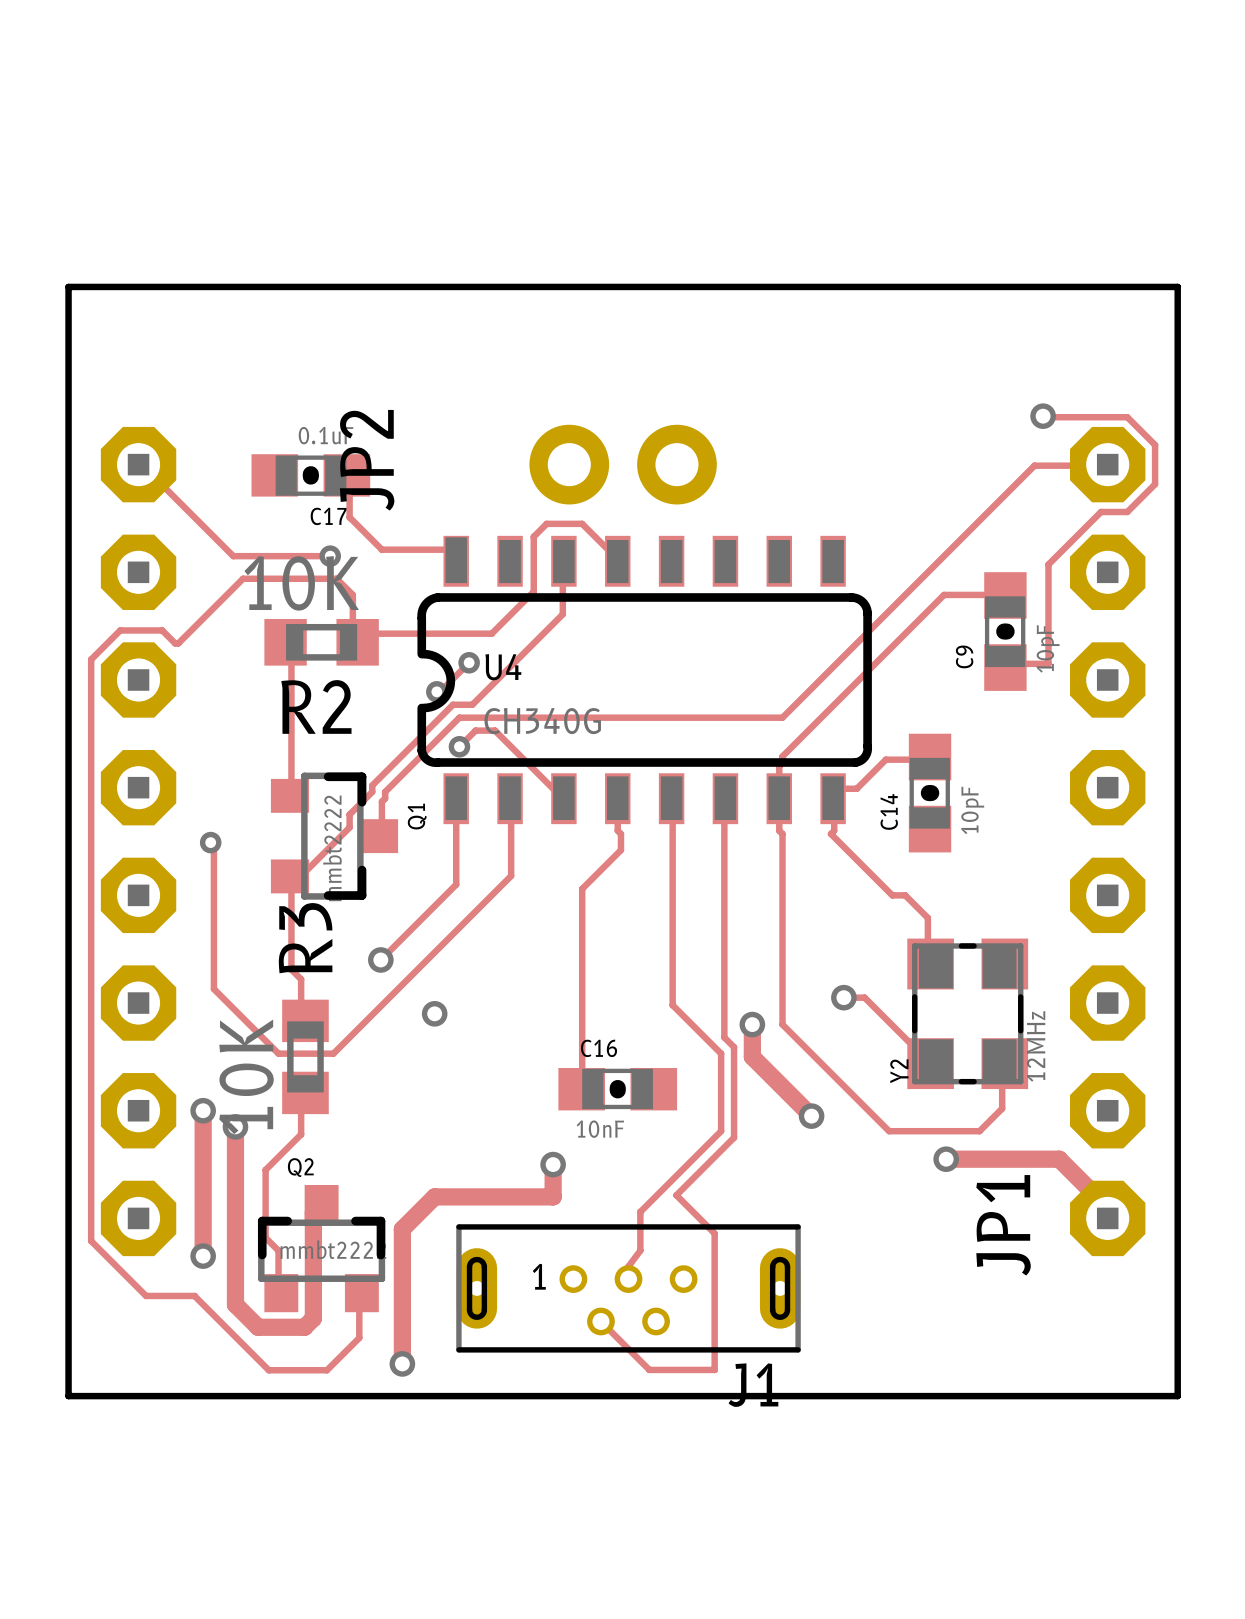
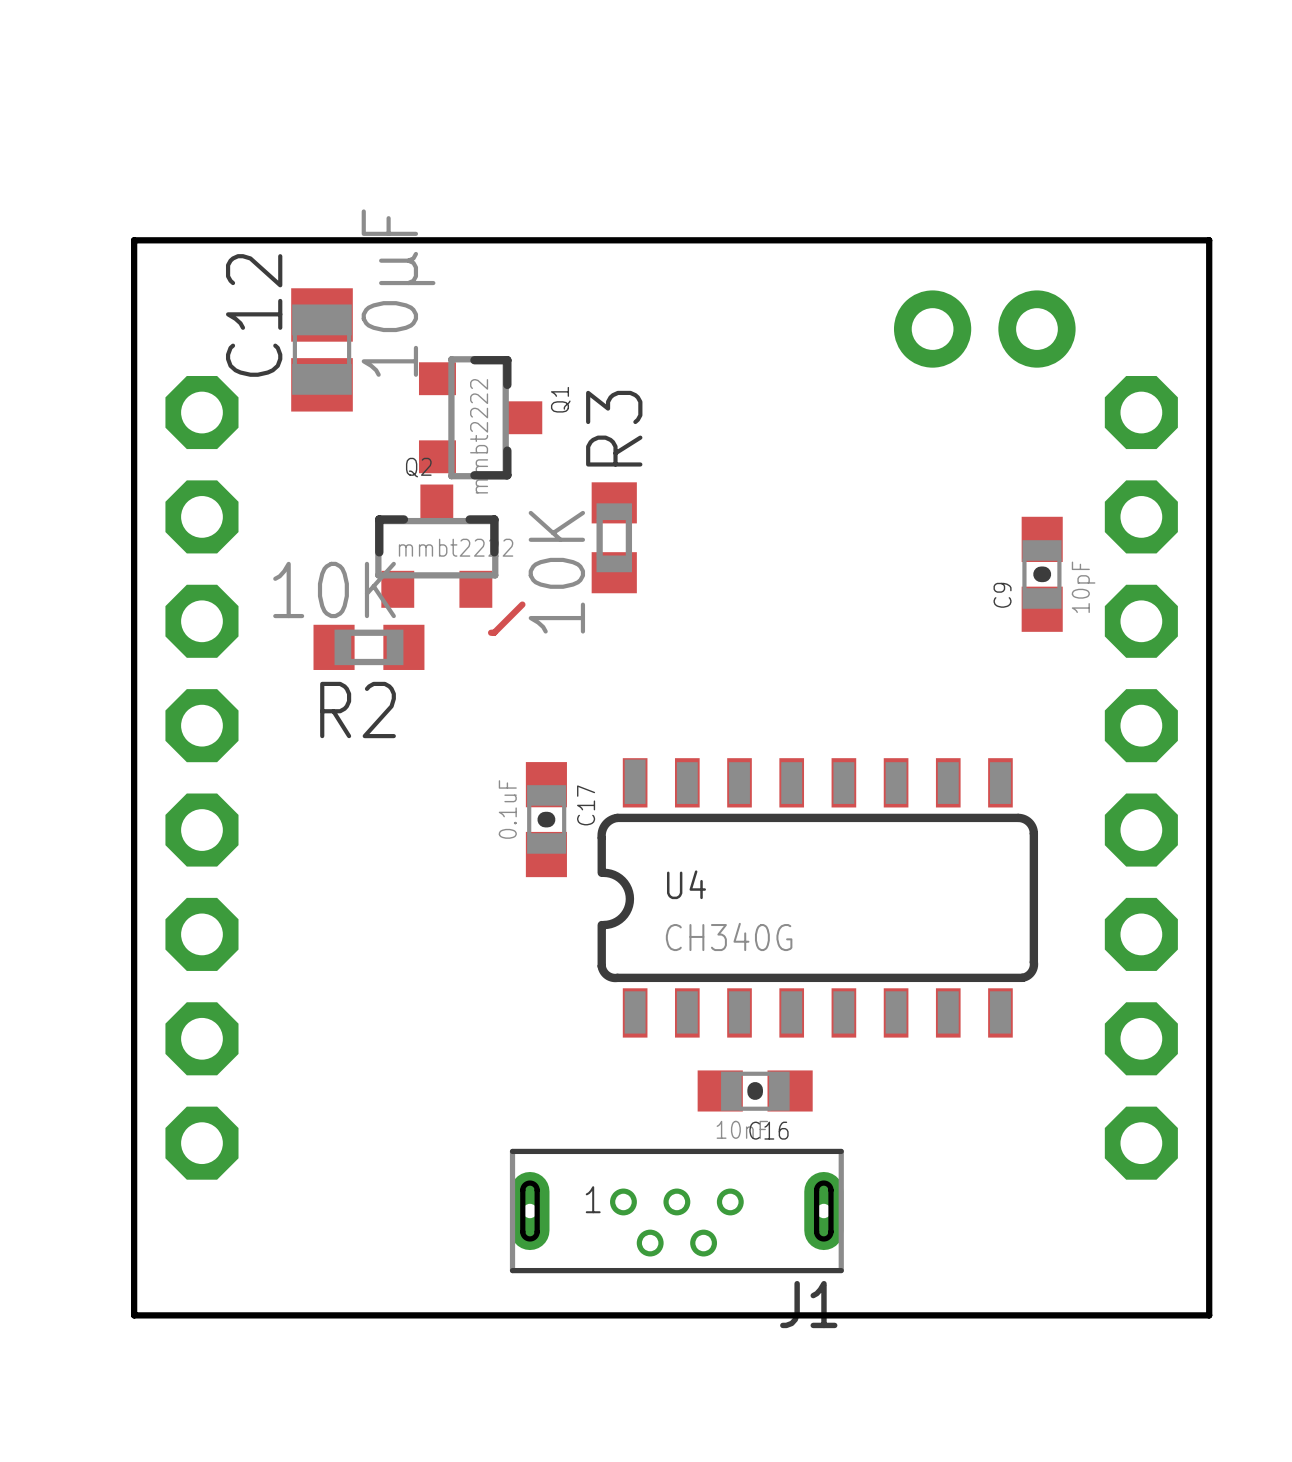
C12: none -> 10µF (322, 349)
track: (1043, 416) (1127, 417) (1155, 445) (1155, 484) (1127, 512) (1101, 512) (1048, 564) (1048, 663) (1009, 663) (1005, 667) -> none
via: (1043, 416) -> none
track: (138, 464) (139, 462) (233, 556) (330, 556) -> none
part position: (623, 464) -> (984, 329)
track: (1107, 464) (1034, 465) (782, 717) (459, 717) (385, 791) (385, 798) (381, 801) (381, 833) (379, 836) -> none
C17 rotation: 0° (310, 475) -> 90° clockwise (546, 819)
C17 position: (310, 475) -> (546, 819)
track: (346, 475) (349, 475) (349, 517) (381, 549) (446, 549) (456, 561) -> none
via: (330, 556) -> none
track: (563, 561) (562, 614) (472, 704) (452, 704) (372, 785) (372, 791) (349, 814) (349, 827) (297, 879) (289, 876) (291, 969) (301, 979) (301, 1014) (305, 1020) -> none
track: (617, 561) (582, 523) (546, 523) (533, 536) (533, 591) (491, 633) (365, 633) (357, 642) (352, 636) (352, 594) (336, 578) (243, 578) (178, 643) (175, 643) (162, 630) (120, 630) (91, 659) (91, 1241) (146, 1295) (194, 1295) (268, 1370) (326, 1370) (359, 1337) (359, 1295) (361, 1293) -> none
track: (1005, 594) (944, 594) (782, 756) (782, 762) (779, 766) (779, 830) (782, 833) (782, 1024) (889, 1131) (979, 1131) (1002, 1108) (1002, 1066) (1004, 1063) -> none
track: (285, 642) (291, 646) (289, 795) -> none
R2 position: (321, 642) -> (368, 647)
via: (469, 662) -> none
U4 position: (644, 679) -> (817, 897)
via: (436, 691) -> none
track: (459, 746) (475, 730) (494, 730) (563, 798) -> none
via: (459, 746) -> none
track: (930, 757) (927, 759) (885, 759) (856, 788) (843, 788) (833, 798) (834, 830) (830, 833) (892, 895) (905, 895) (927, 917) (927, 963) (930, 964) -> none
C14: 10pF (930, 793) -> none
track: (456, 798) (456, 884) (380, 959) -> none
track: (510, 798) (511, 875) (333, 1053) (278, 1053) (213, 989) (213, 845) (210, 842) -> none
track: (617, 798) (617, 830) (620, 833) (620, 850) (582, 888) (582, 1089) -> none
track: (671, 798) (672, 1005) (721, 1053) (721, 1131) (640, 1211) (640, 1250) (628, 1266) (628, 1279) -> none
track: (725, 798) (724, 1037) (734, 1047) (734, 1137) (676, 1195) (714, 1233) (714, 1369) (649, 1369) (600, 1321) -> none
Q1 position: (334, 836) -> (480, 417)
JP2 side: top (138, 841) -> bottom (1141, 777)
JP1 side: top (1107, 841) -> bottom (201, 777)
via: (210, 842) -> none
via: (380, 959) -> none
track: (843, 997) (864, 997) (930, 1063) -> none
via: (843, 997) -> none
via: (434, 1013) -> none
Y2: 12MHz (967, 1013) -> none
track: (752, 1024) (752, 1056) (811, 1116) -> none
via: (752, 1024) -> none
C16 name position: C16 (599, 1048) -> C16 (768, 1130)
R3 position: (305, 1056) -> (614, 537)
C16 position: (617, 1089) -> (755, 1090)
track: (305, 1092) (301, 1098) (301, 1134) (265, 1169) (265, 1237) (278, 1250) (278, 1292) (281, 1293) -> none
track: (203, 1110) (203, 1256) -> none
via: (203, 1110) -> none
via: (811, 1116) -> none
track: (235, 1126) (235, 1304) (258, 1327) (304, 1327) (313, 1318) (313, 1212) (321, 1204) -> none
via: (235, 1126) -> none
track: (946, 1159) (1059, 1159) (1107, 1207) (1107, 1218) -> none
via: (946, 1159) -> none
track: (553, 1164) (553, 1196) (434, 1196) (402, 1229) (402, 1363) -> none
via: (553, 1164) -> none
Q2 position: (321, 1248) -> (436, 546)
via: (203, 1256) -> none
via: (402, 1363) -> none

